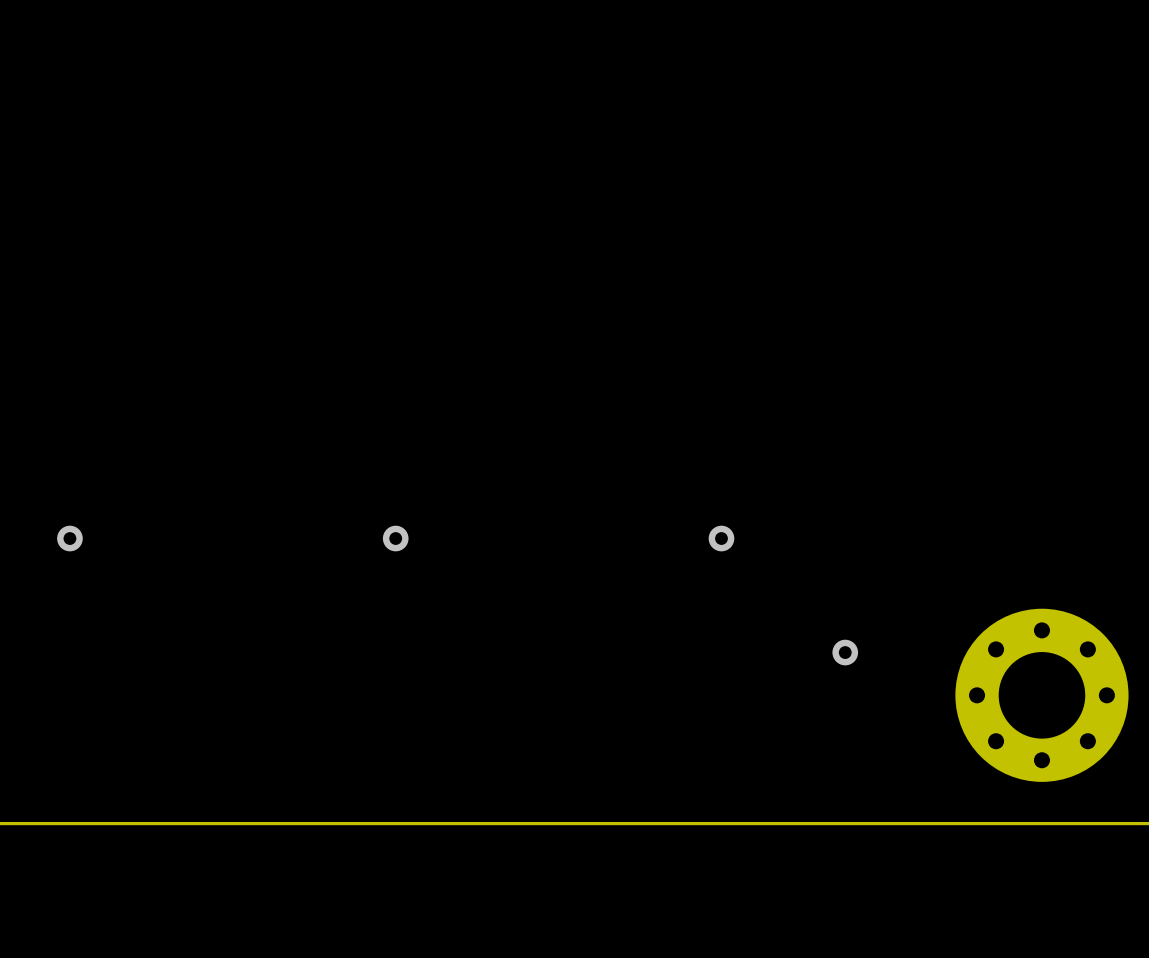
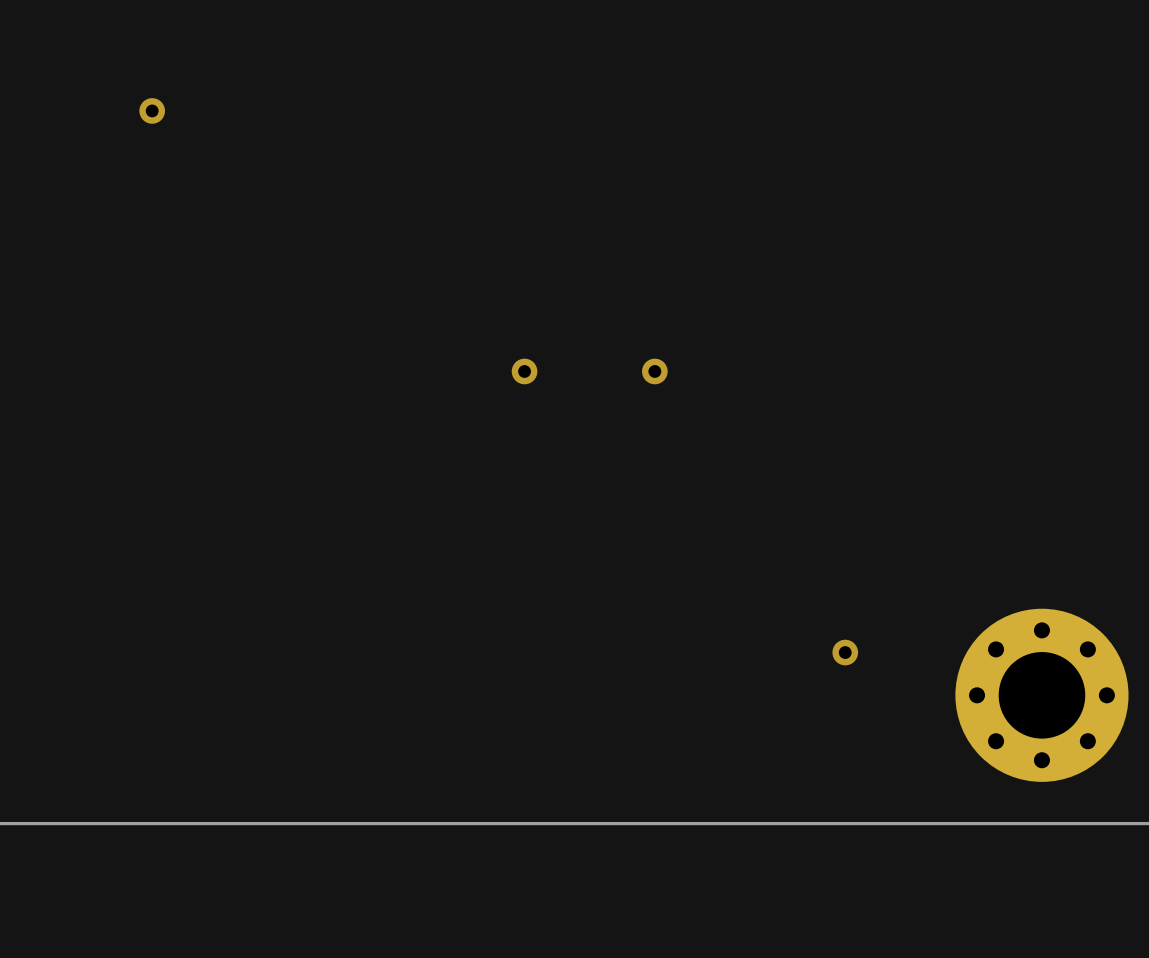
via: none -> (152, 110)
via: none -> (524, 371)
via: none -> (654, 371)
via: (69, 538) -> none
via: (395, 538) -> none
via: (721, 538) -> none

